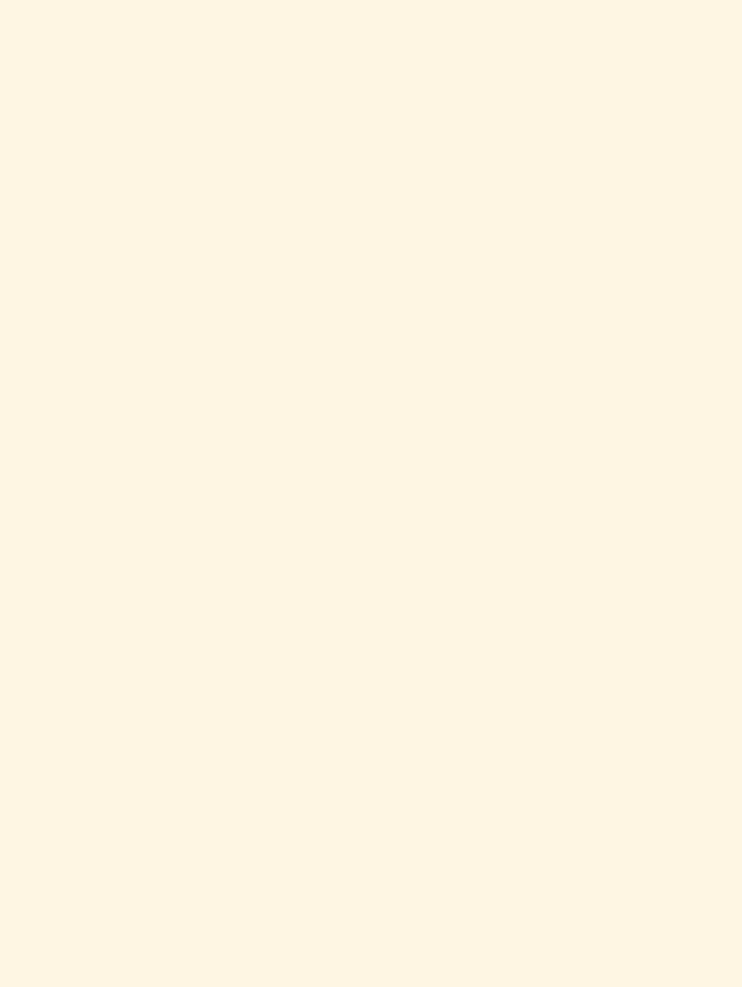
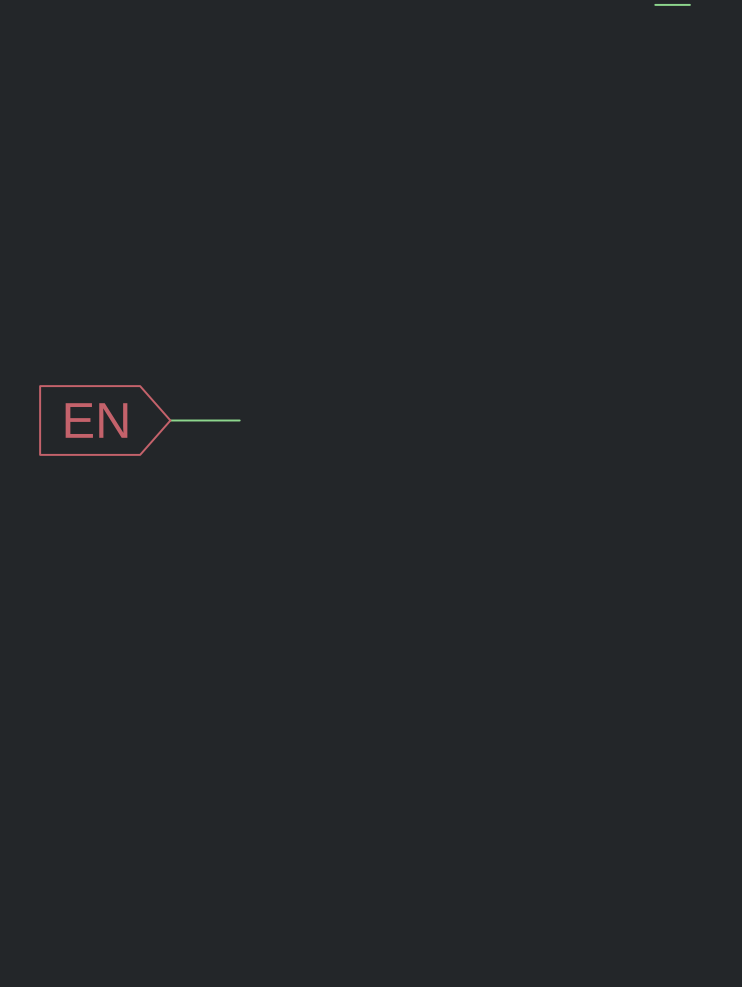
wire: none -> (655, 4) (689, 4)
global label: none -> EN (96, 420)
wire: none -> (170, 420) (239, 420)

